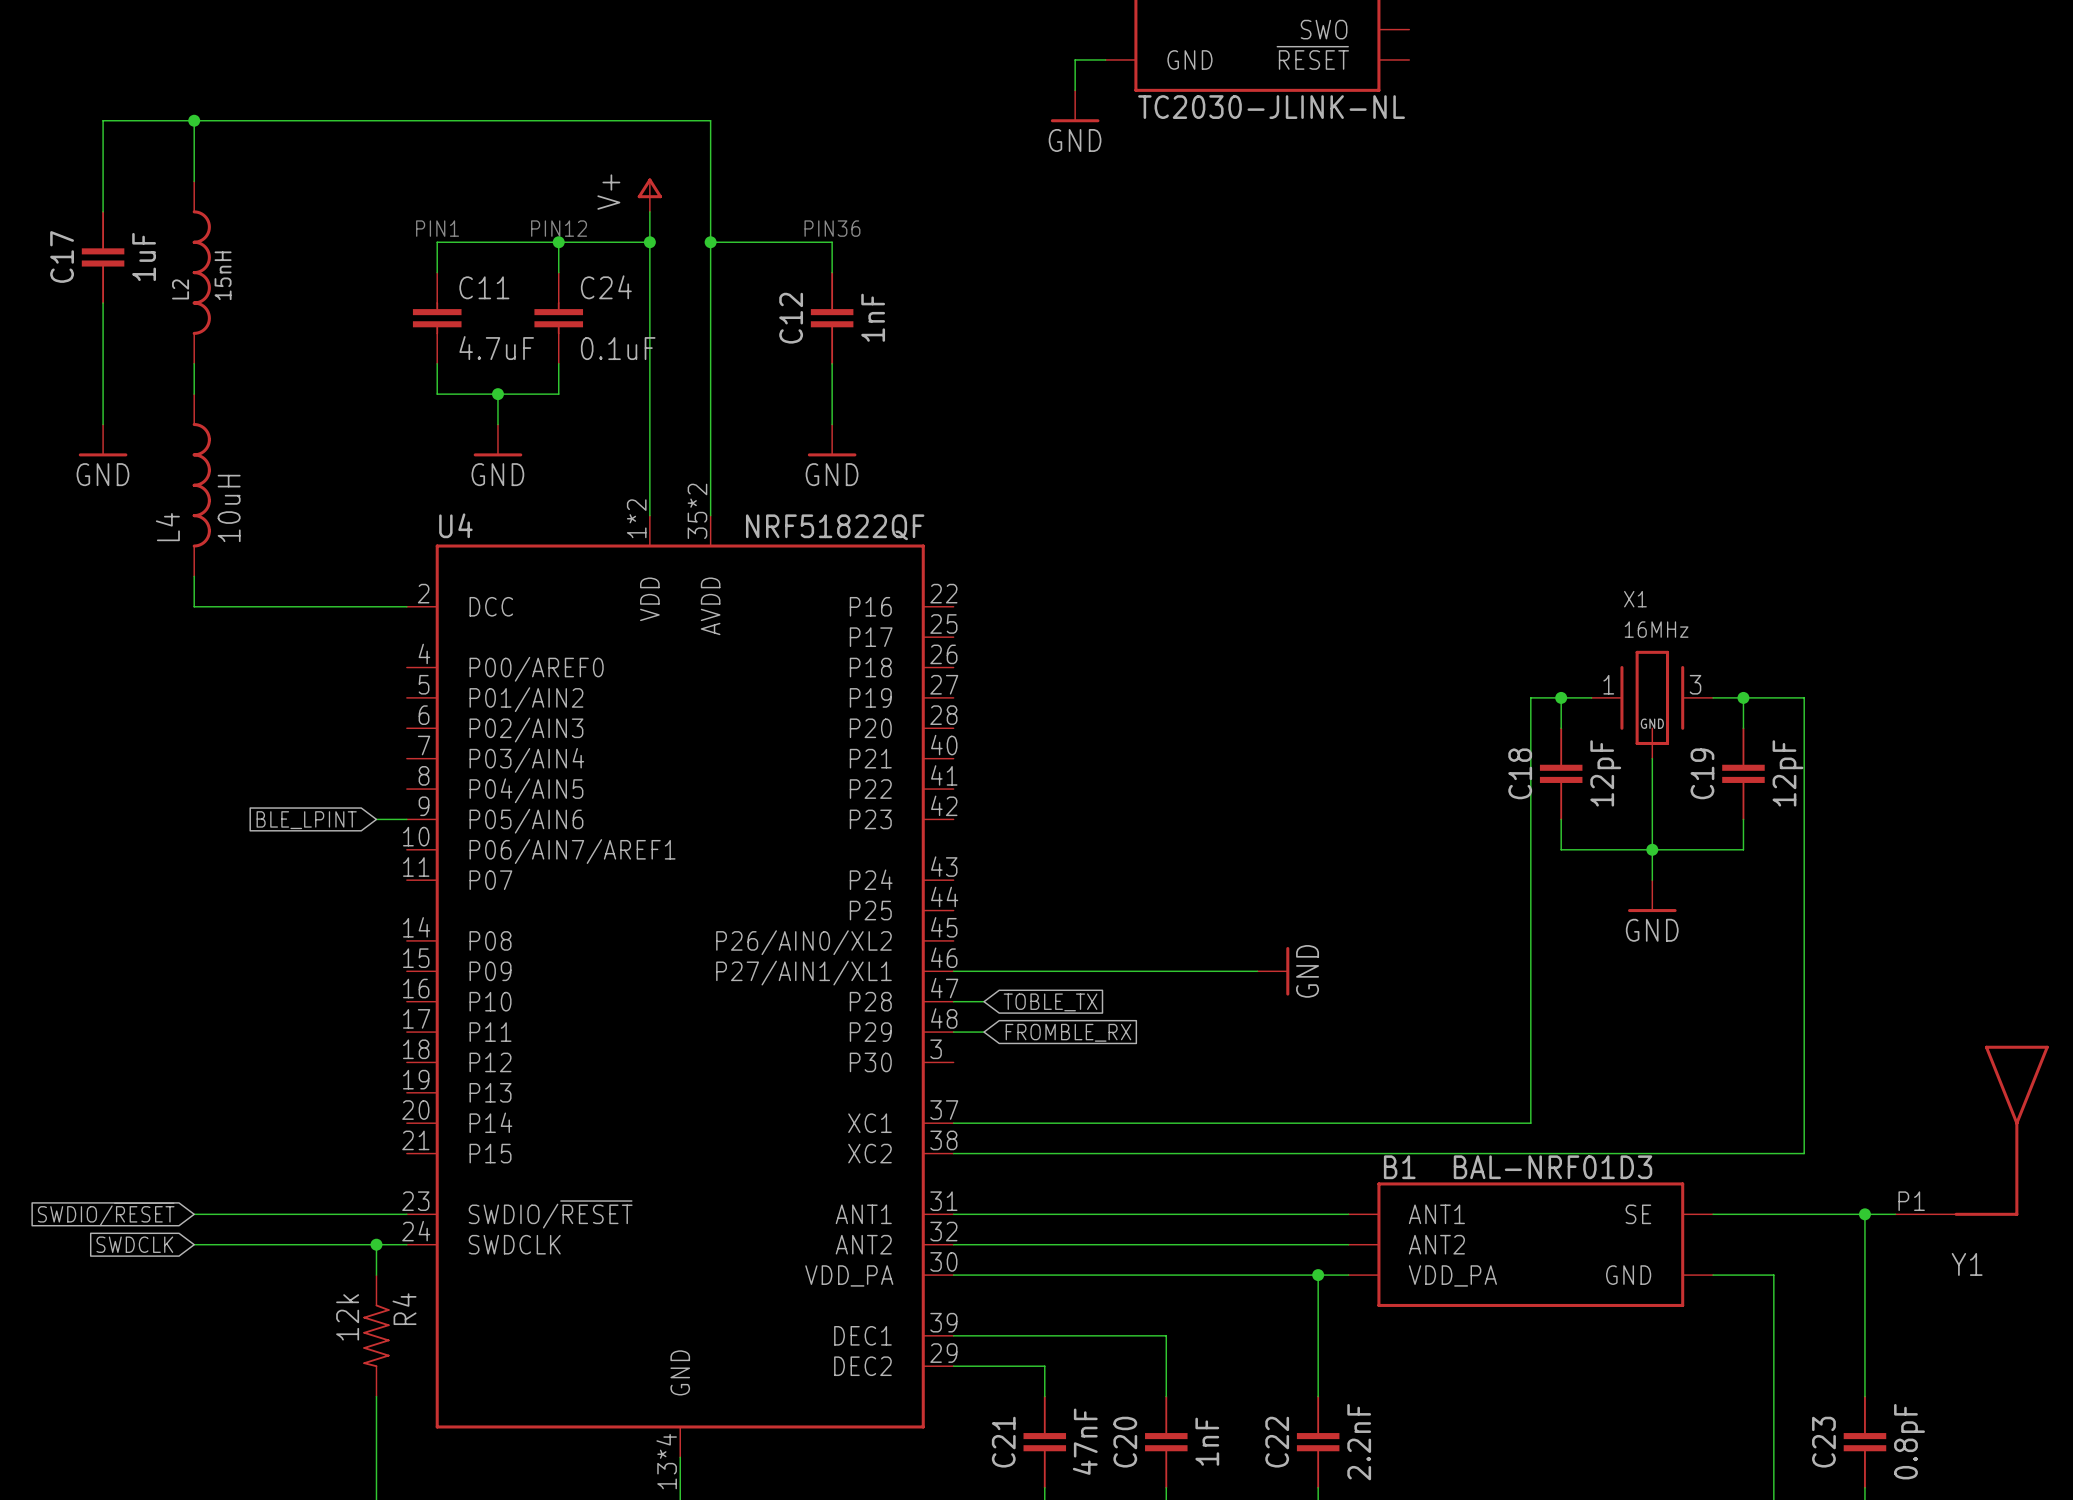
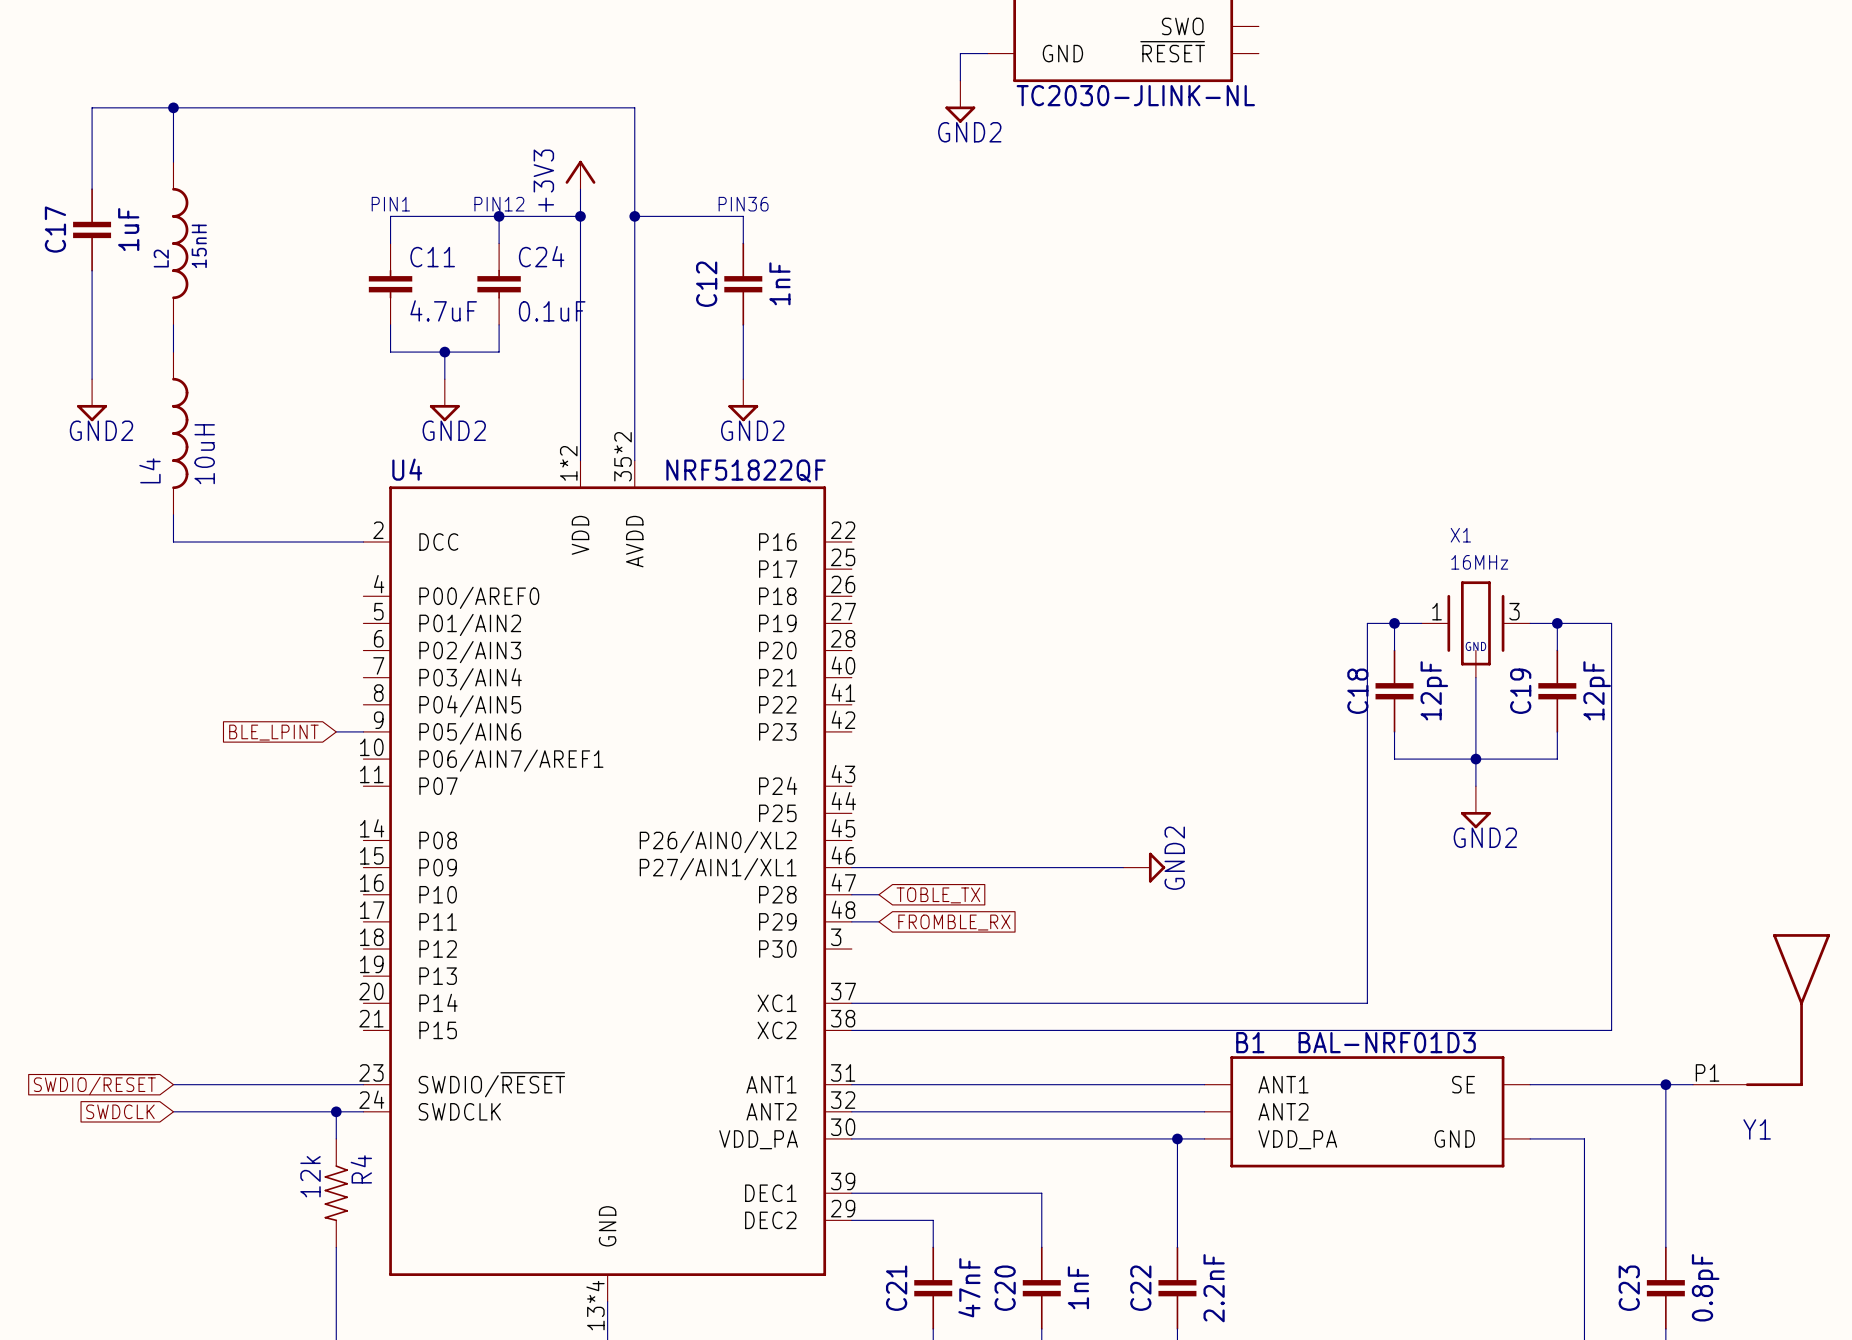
power symbol: GND (1075, 106) -> GND2 (960, 101)
power symbol: V+ (649, 195) -> +3V3 (580, 175)
power symbol: GND (103, 440) -> GND2 (92, 400)
power symbol: GND (497, 440) -> GND2 (444, 400)
power symbol: GND (832, 440) -> GND2 (743, 400)
power symbol: GND (1652, 896) -> GND2 (1475, 807)
power symbol: GND (1273, 971) -> GND2 (1144, 867)

